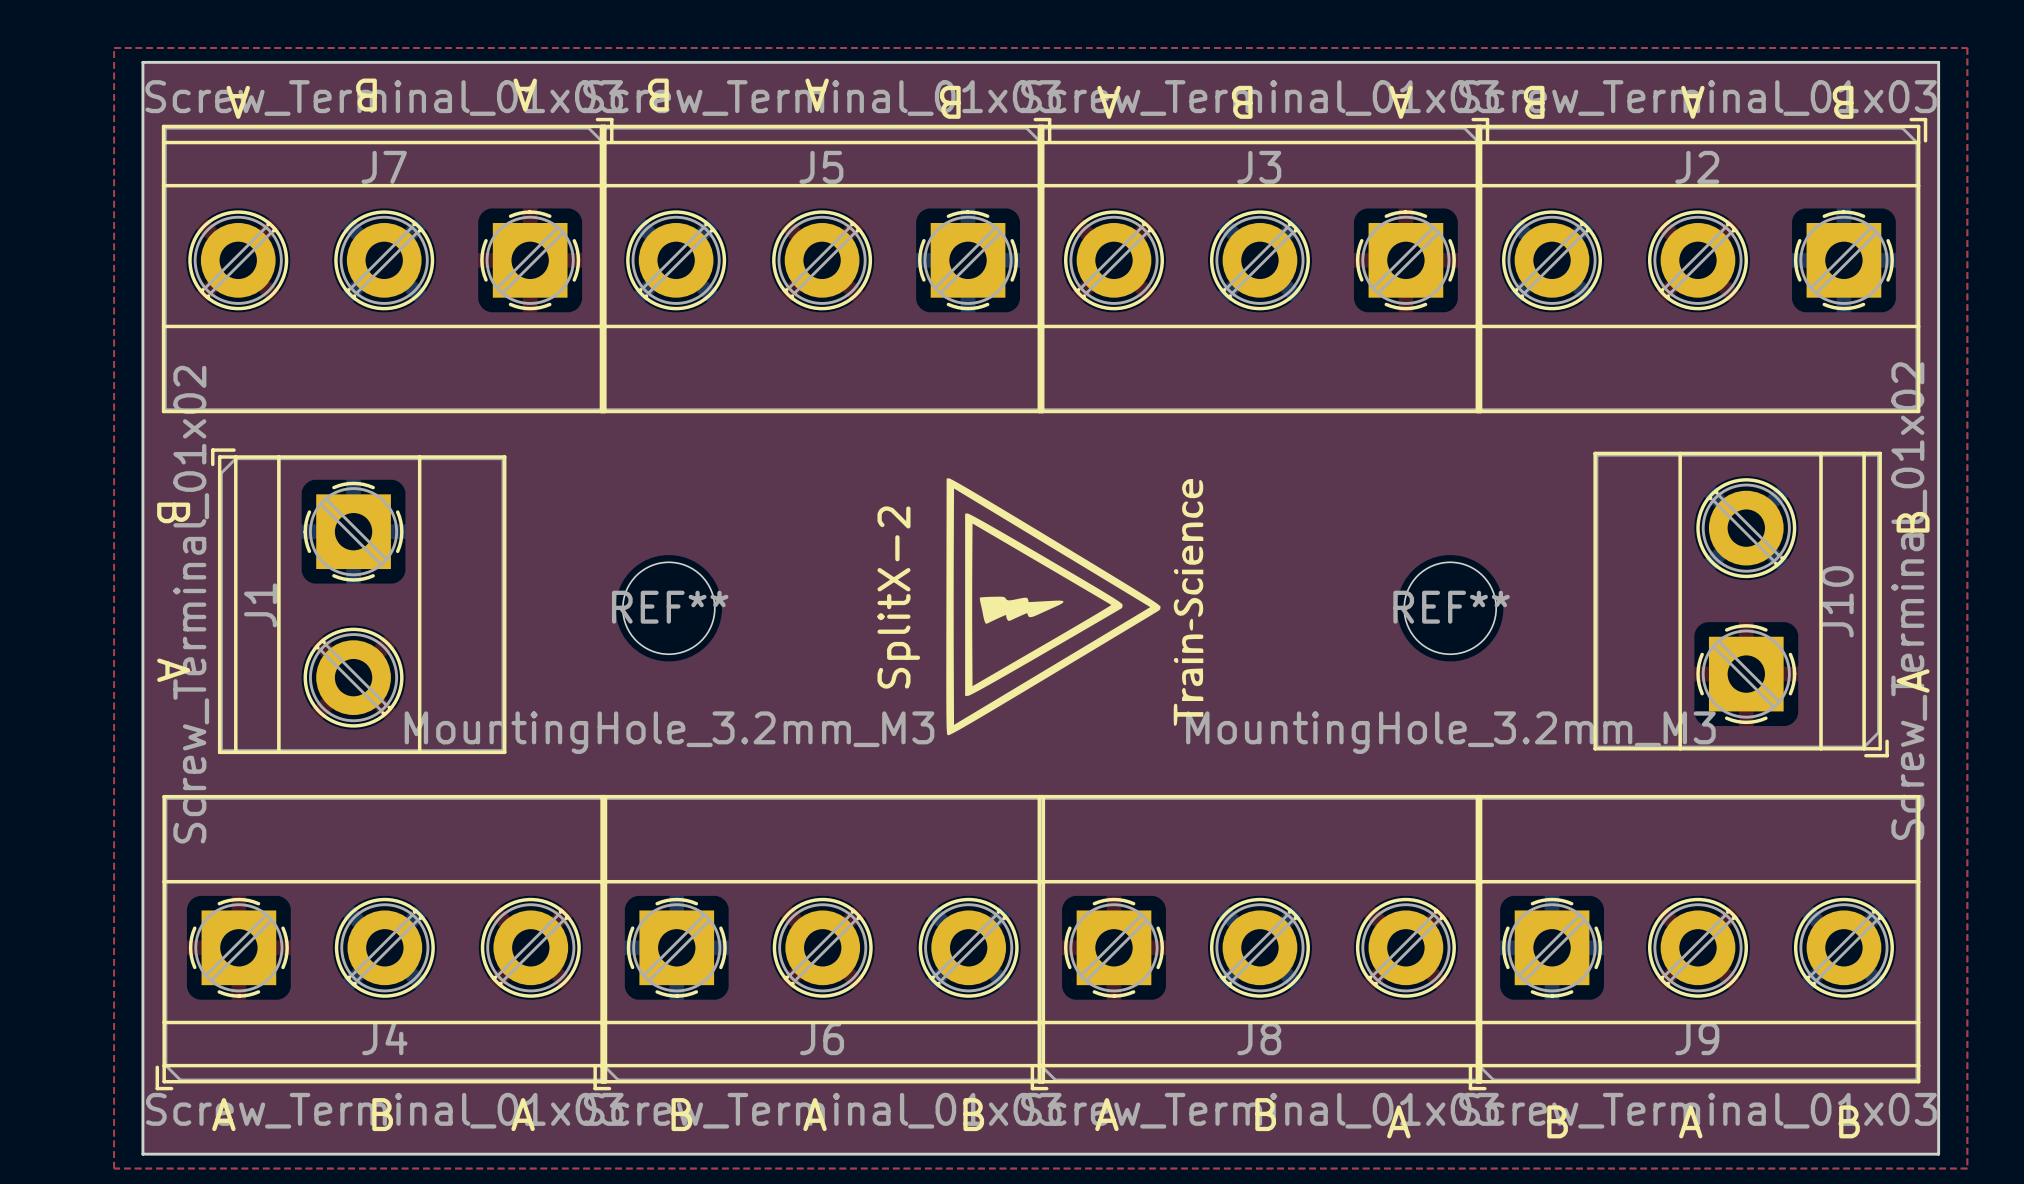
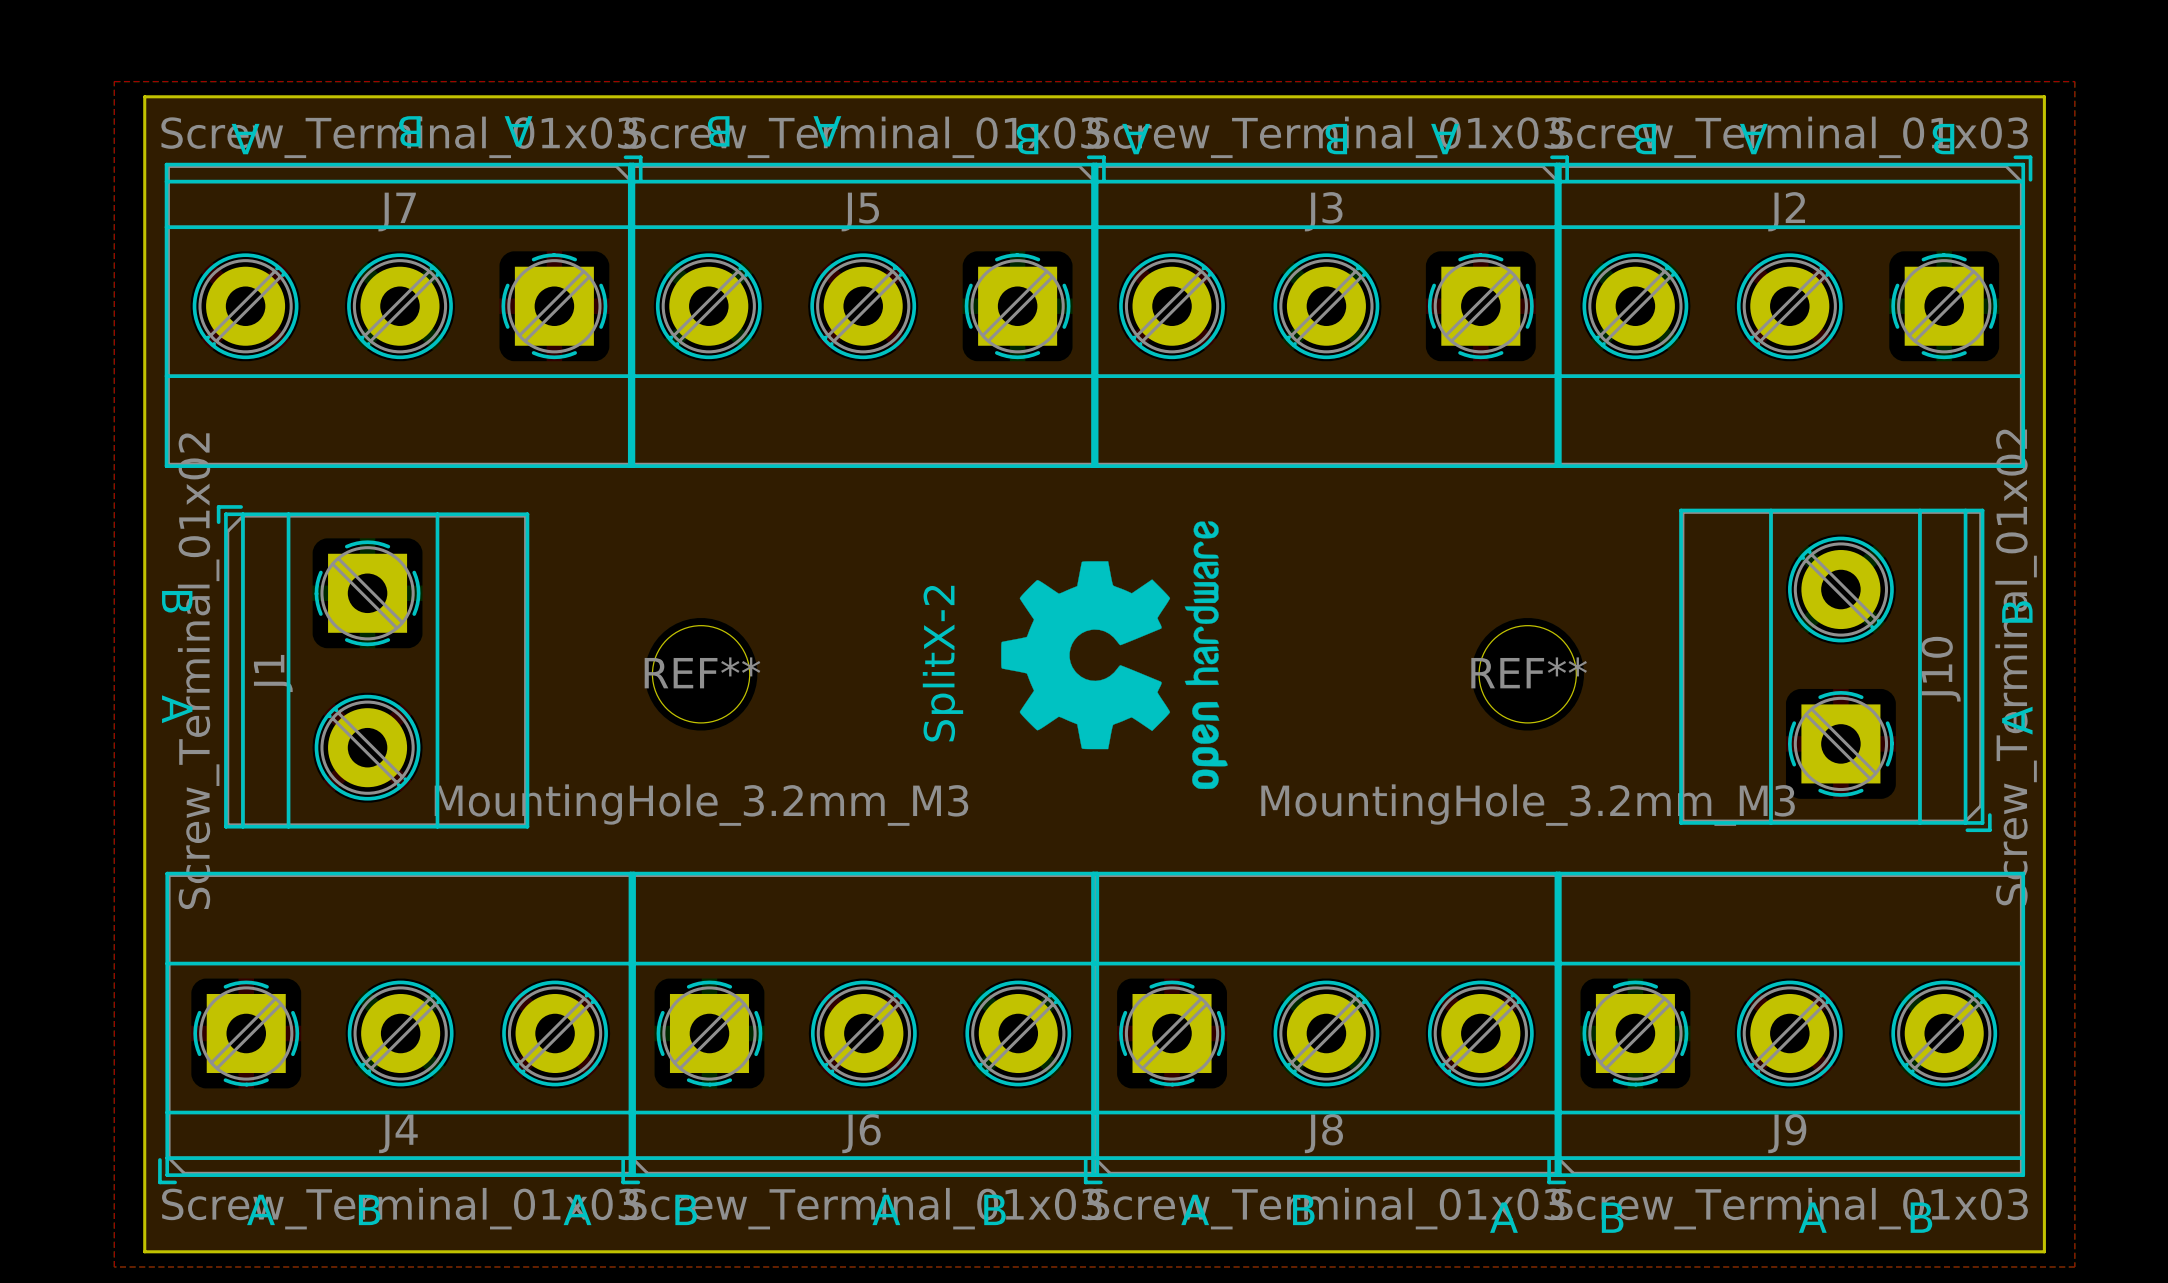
drawing shape: [946, 478, 1204, 736] -> [1001, 521, 1228, 789]

